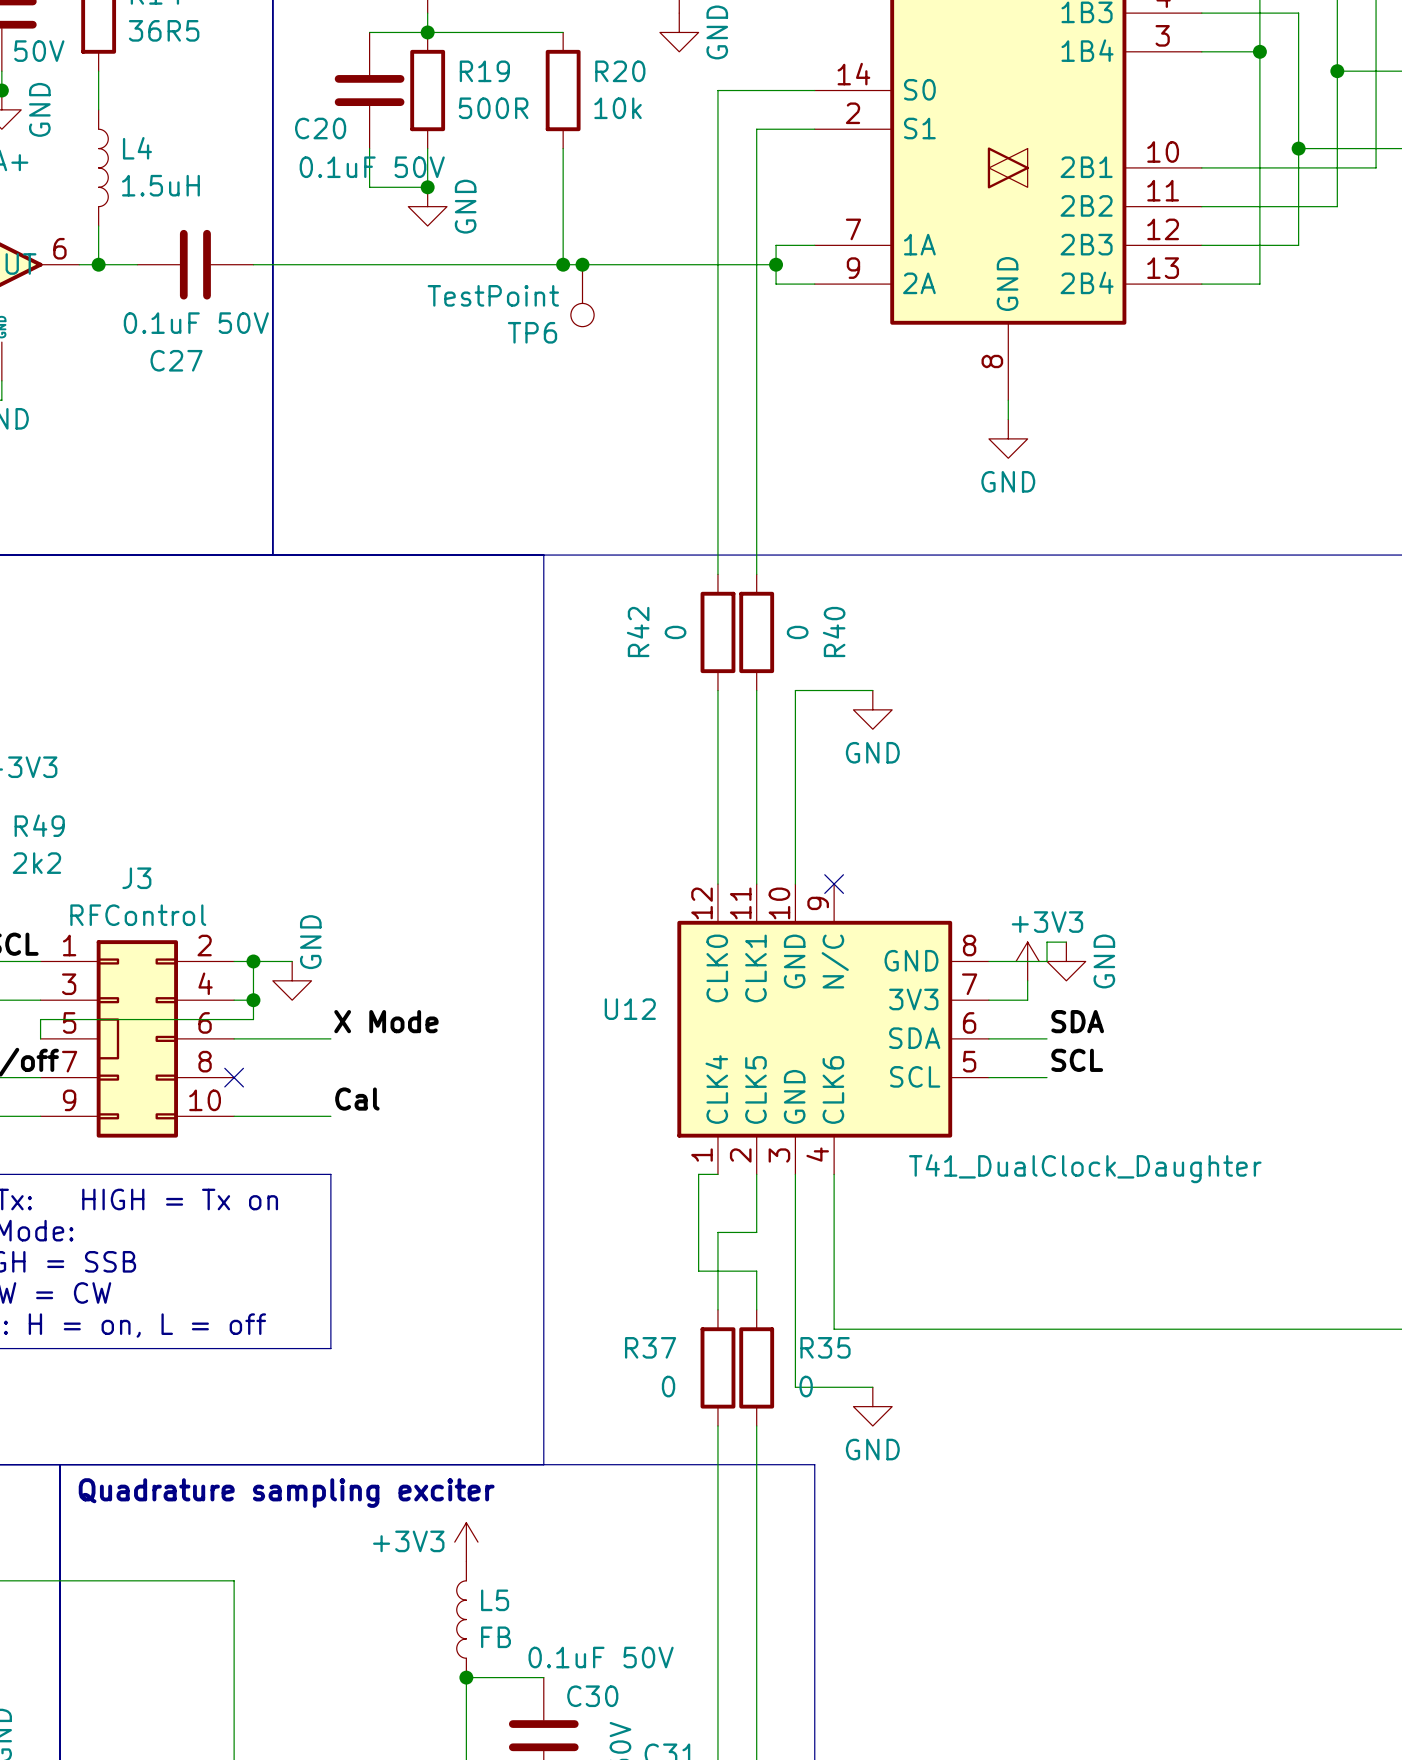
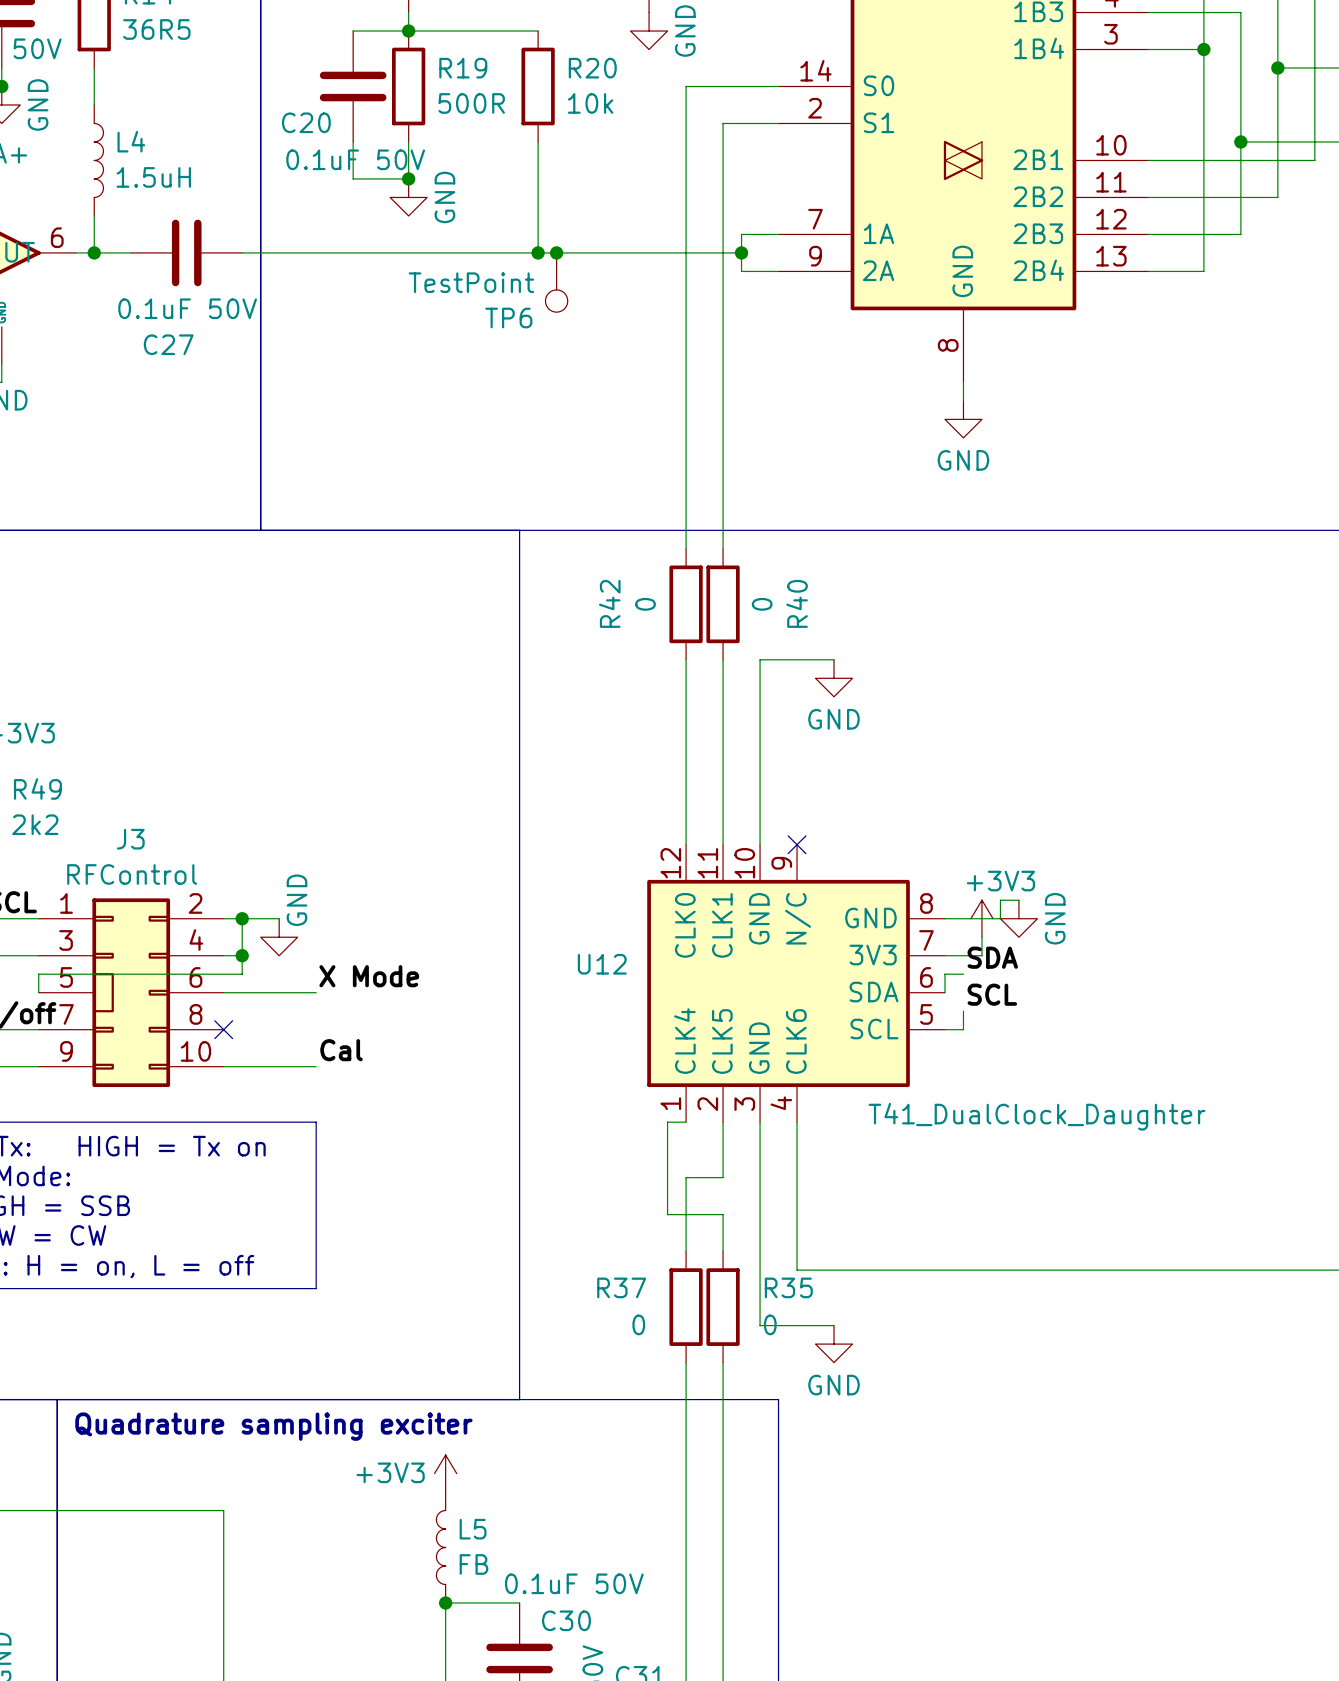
label position: SDA (1077, 1021) -> SDA (992, 957)
wire: (988, 1038) (1047, 1038) -> (944, 992) (944, 974) (963, 974)
label position: SCL (1077, 1060) -> SCL (992, 994)
wire: (1008, 1077) (1047, 1077) -> (963, 1029) (963, 1011)

